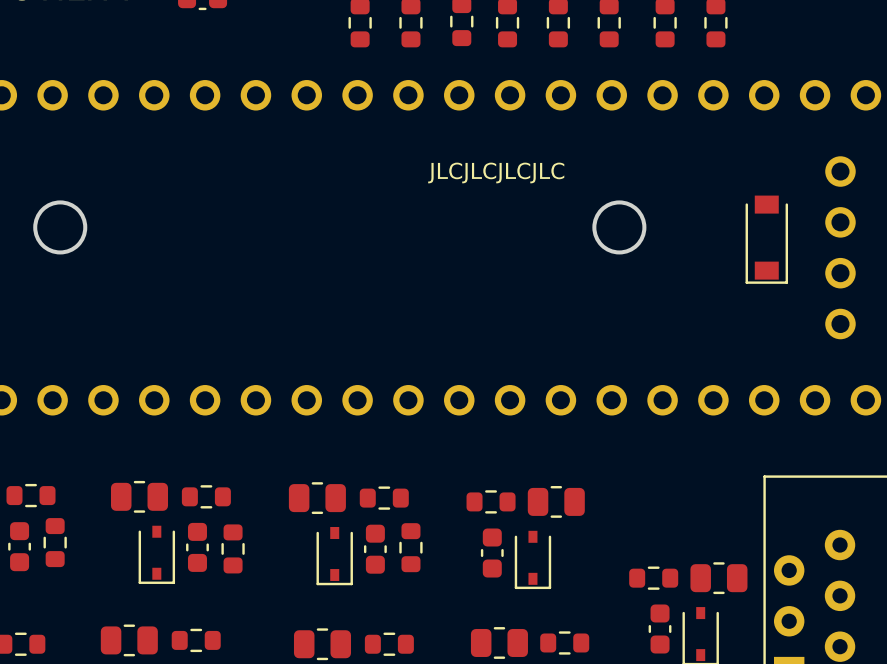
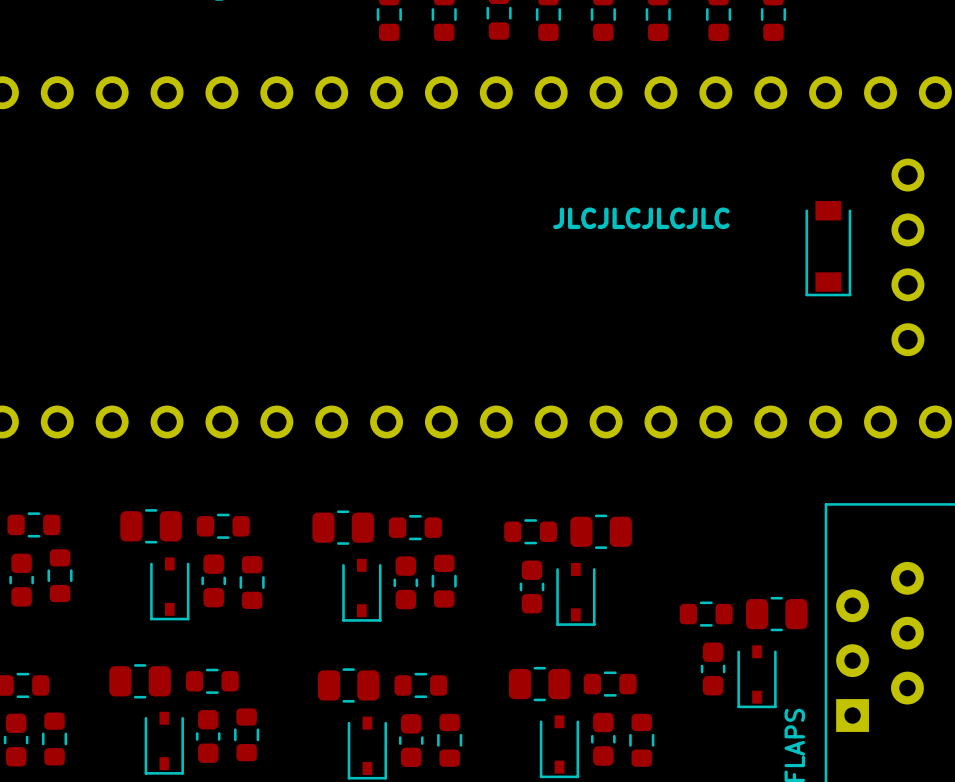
text position: JLCJLCJLCJLC (496, 172) -> JLCJLCJLCJLC (641, 218)
round board edge: [33, 200, 88, 255] -> none
round board edge: [592, 200, 647, 255] -> none

